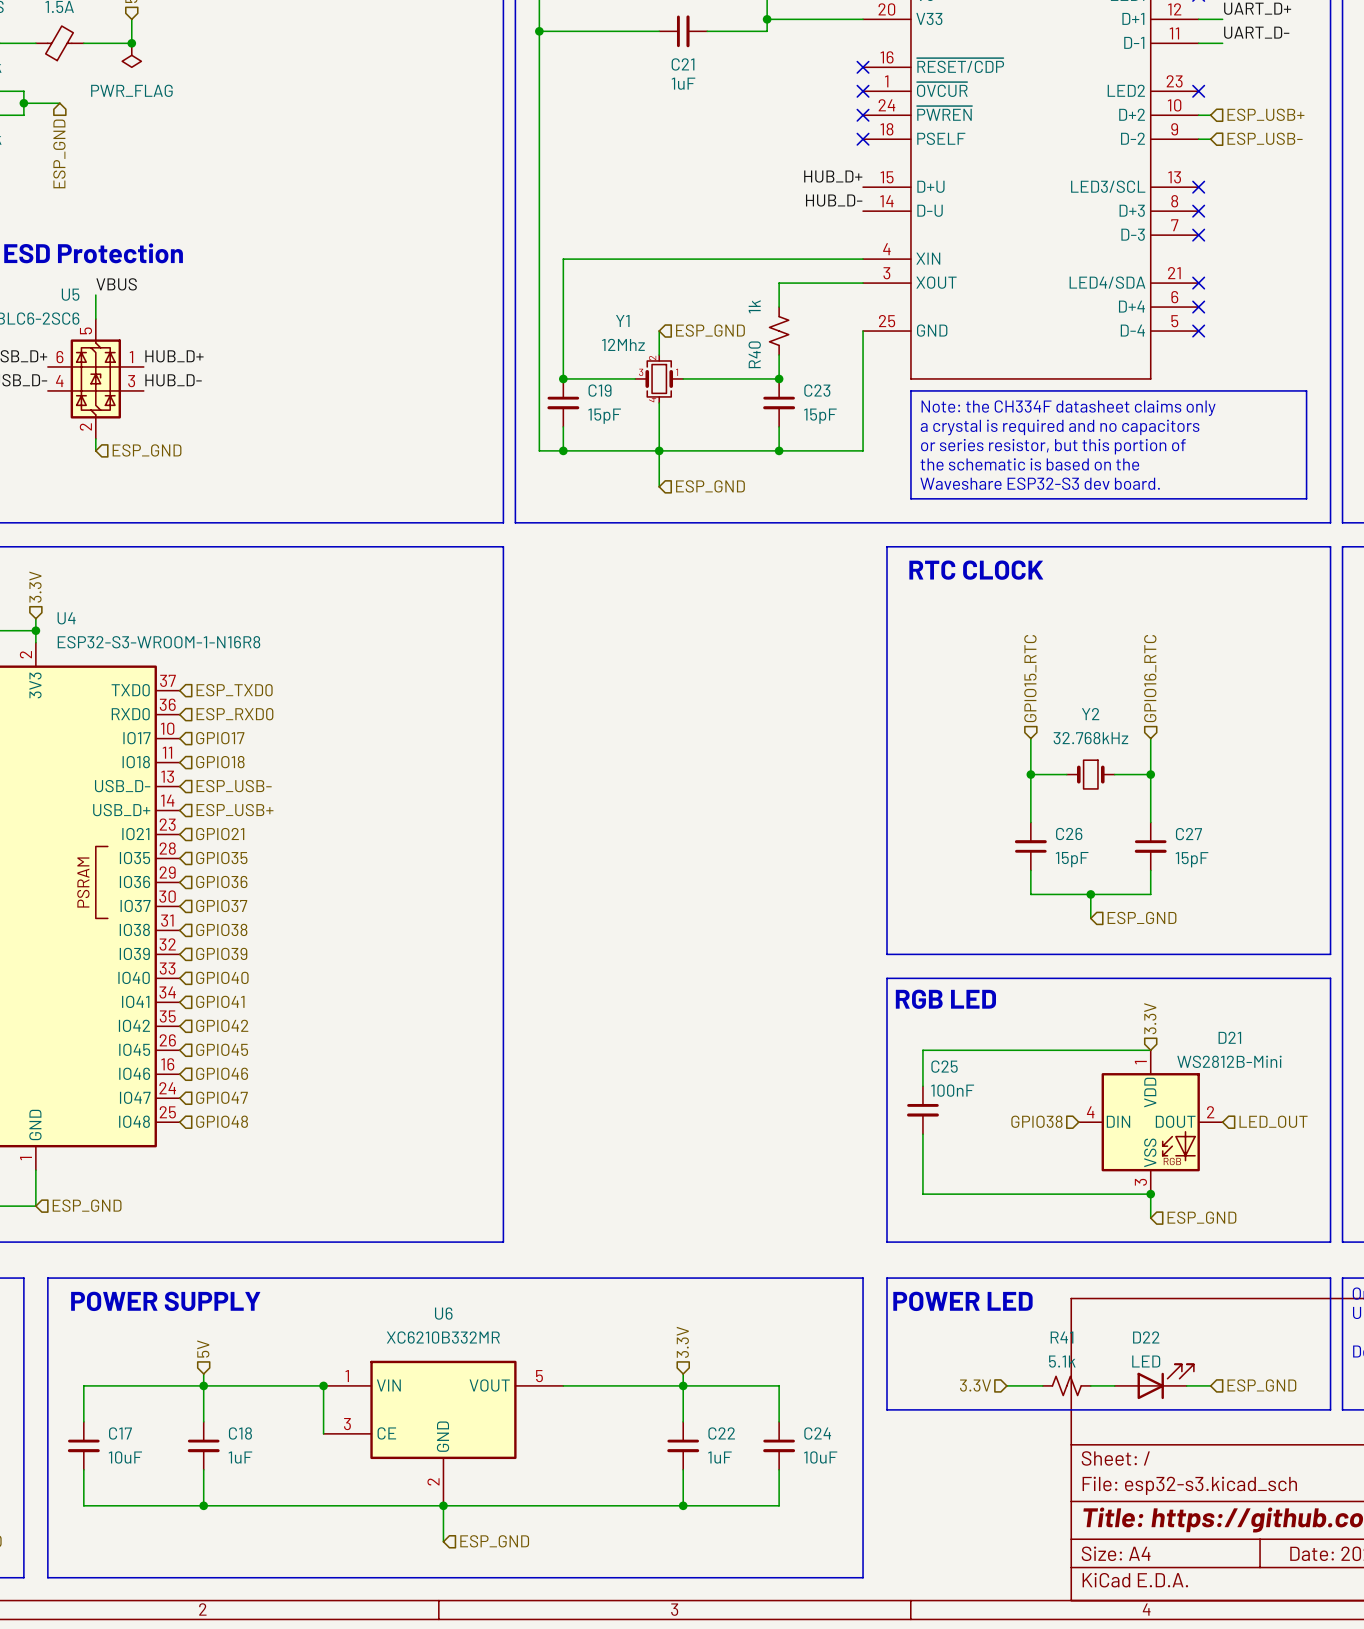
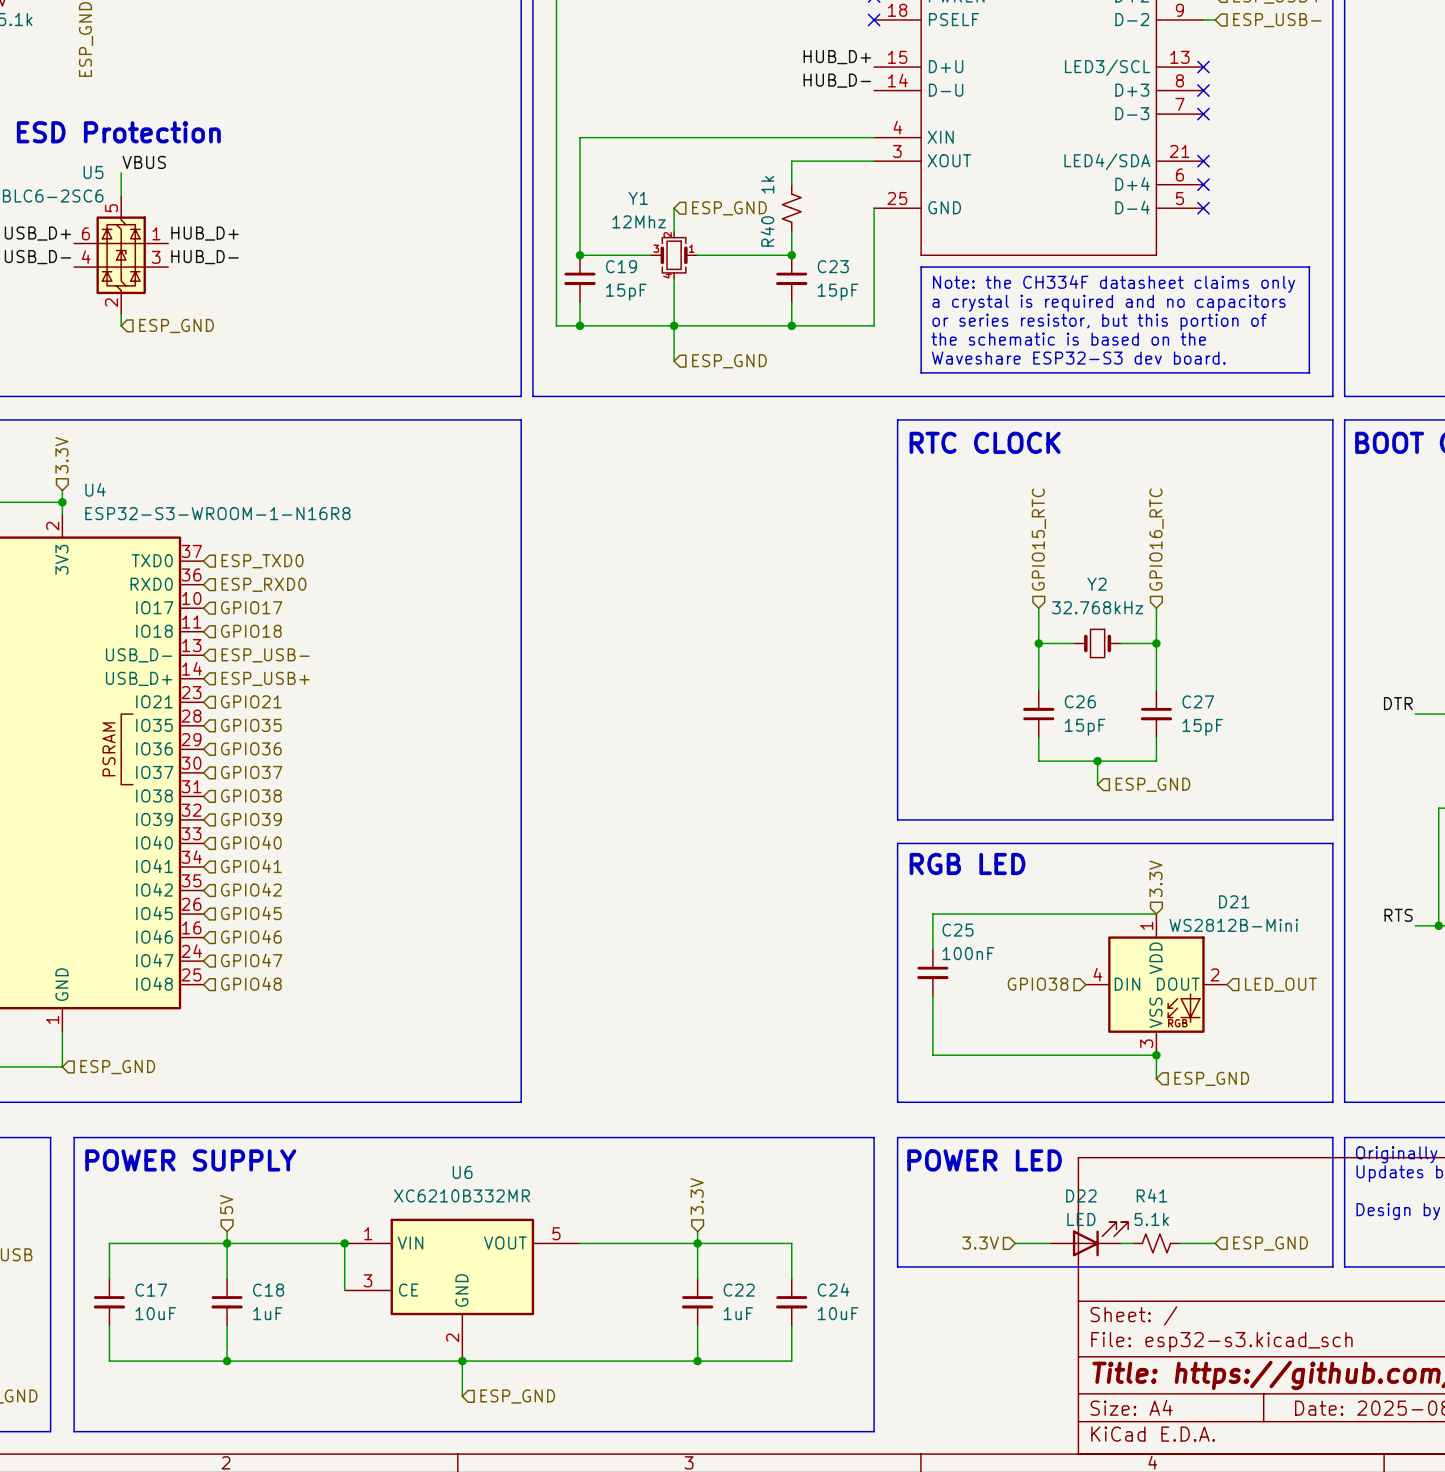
D22 position: (1154, 1381) -> (1089, 1239)
R41 position: (1066, 1385) -> (1156, 1243)

